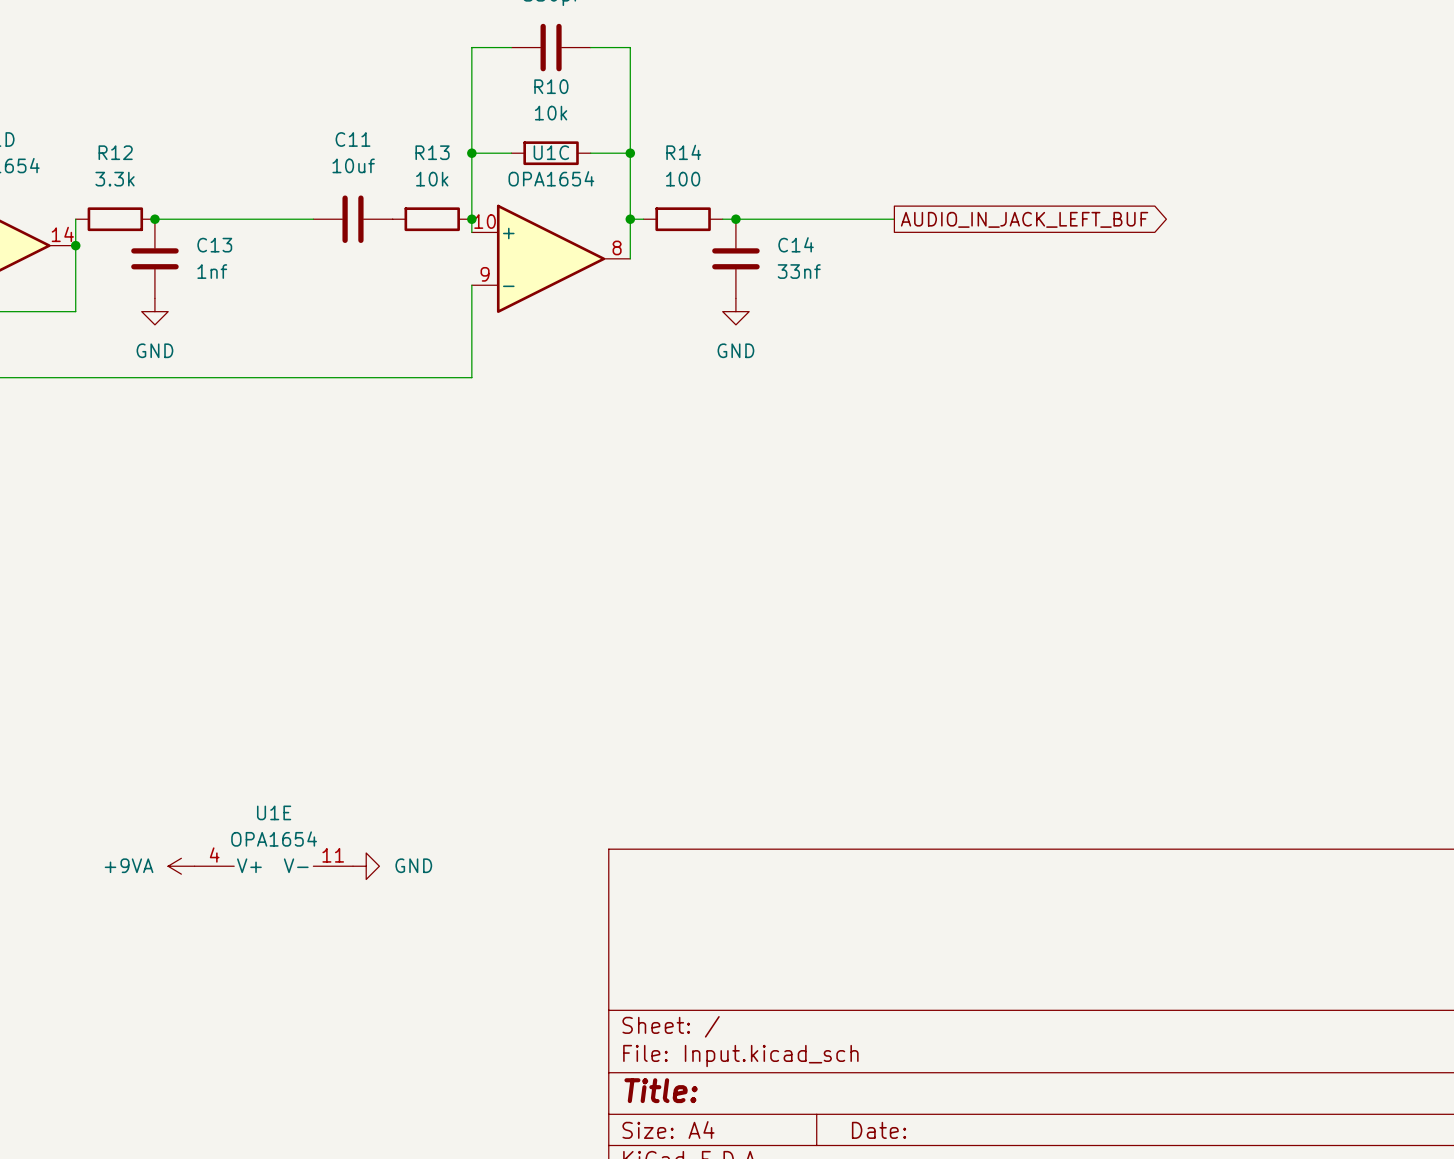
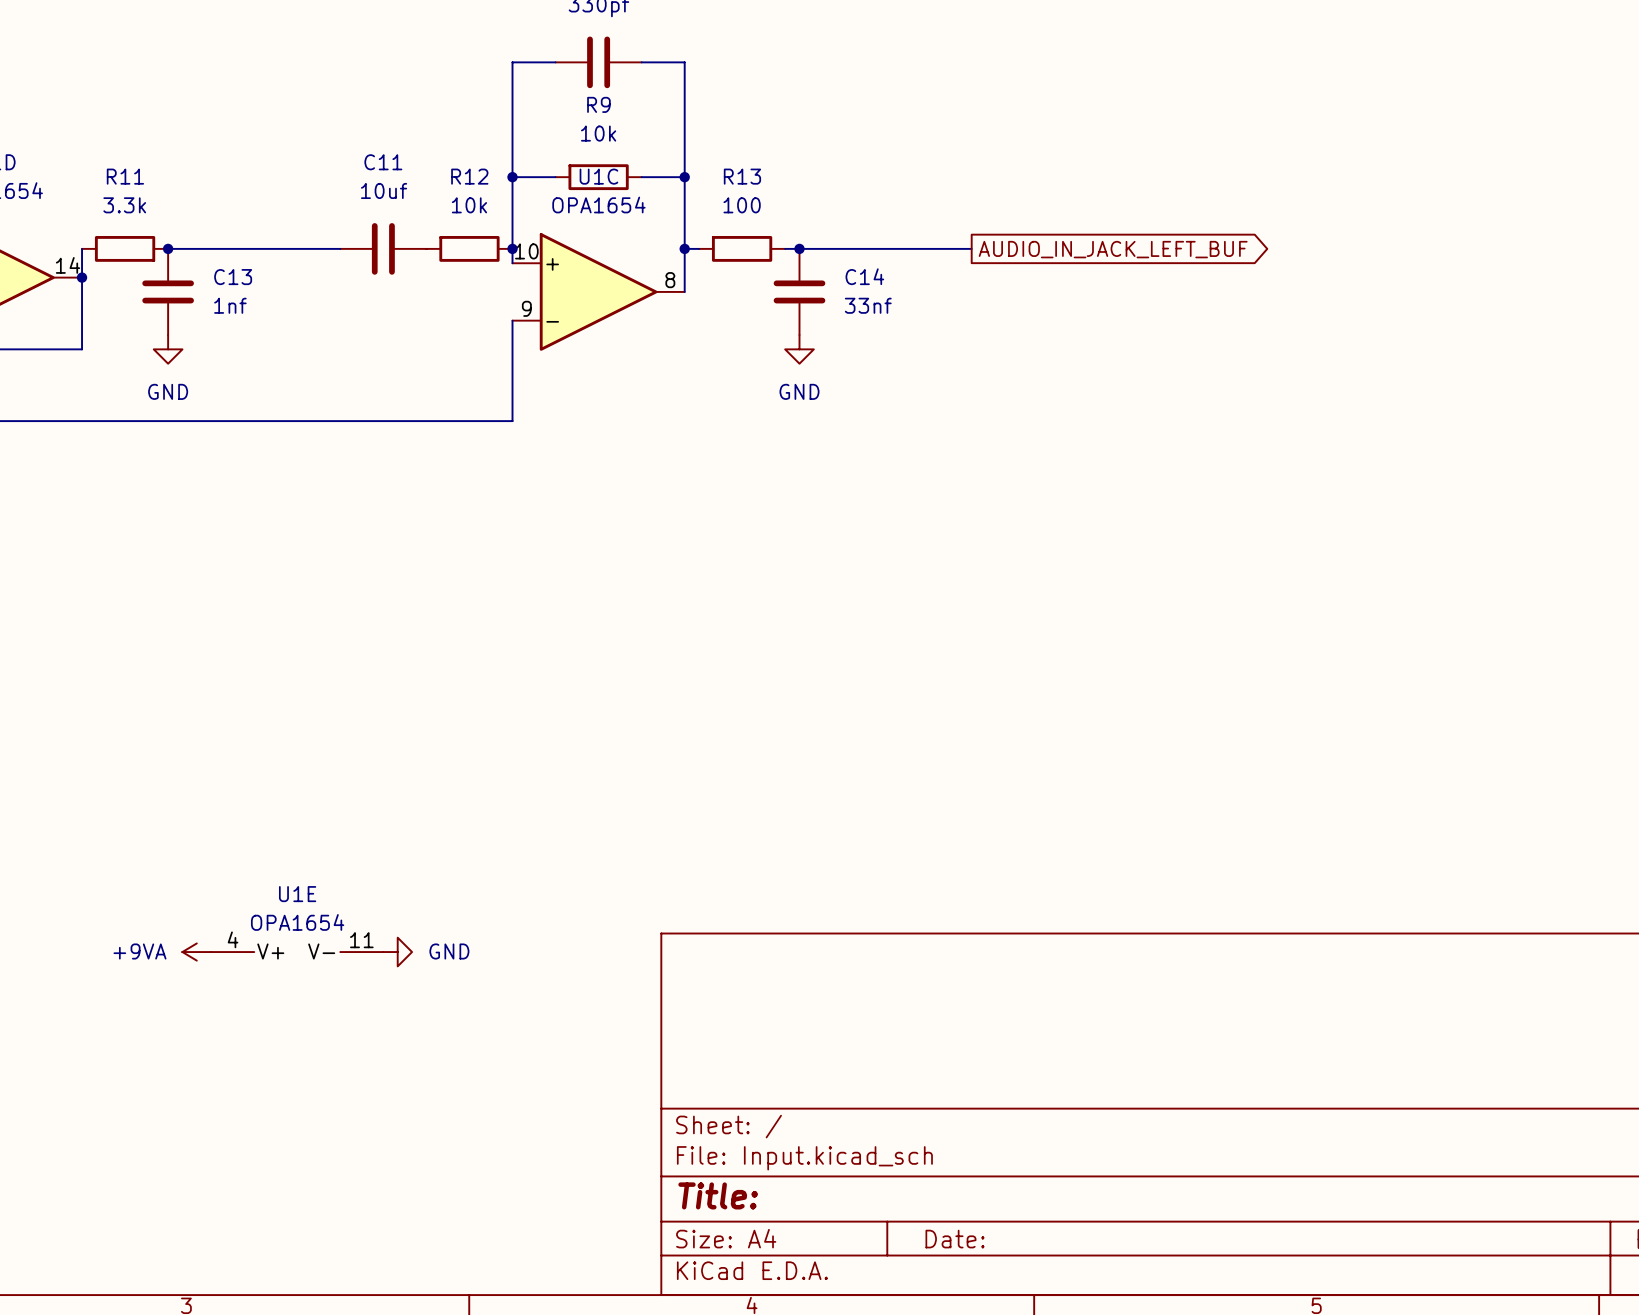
R10 name: R10 (551, 86) -> R9 (598, 104)
R12 name: R12 (115, 152) -> R11 (125, 176)
R13 name: R13 (432, 152) -> R12 (469, 176)
R14 name: R14 (683, 152) -> R13 (742, 176)

